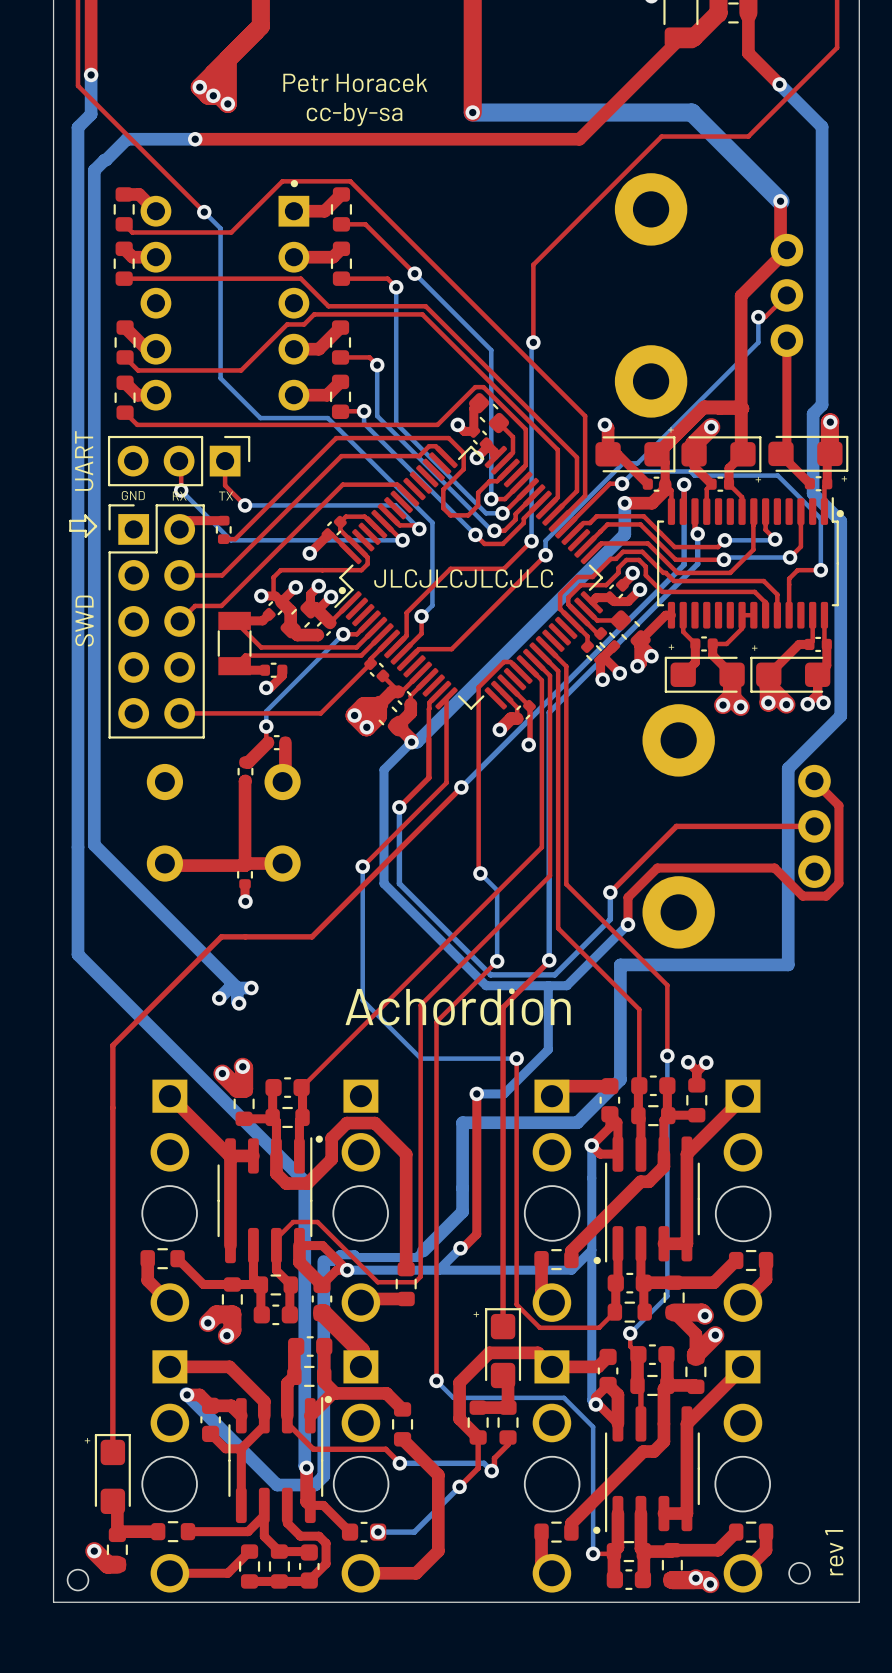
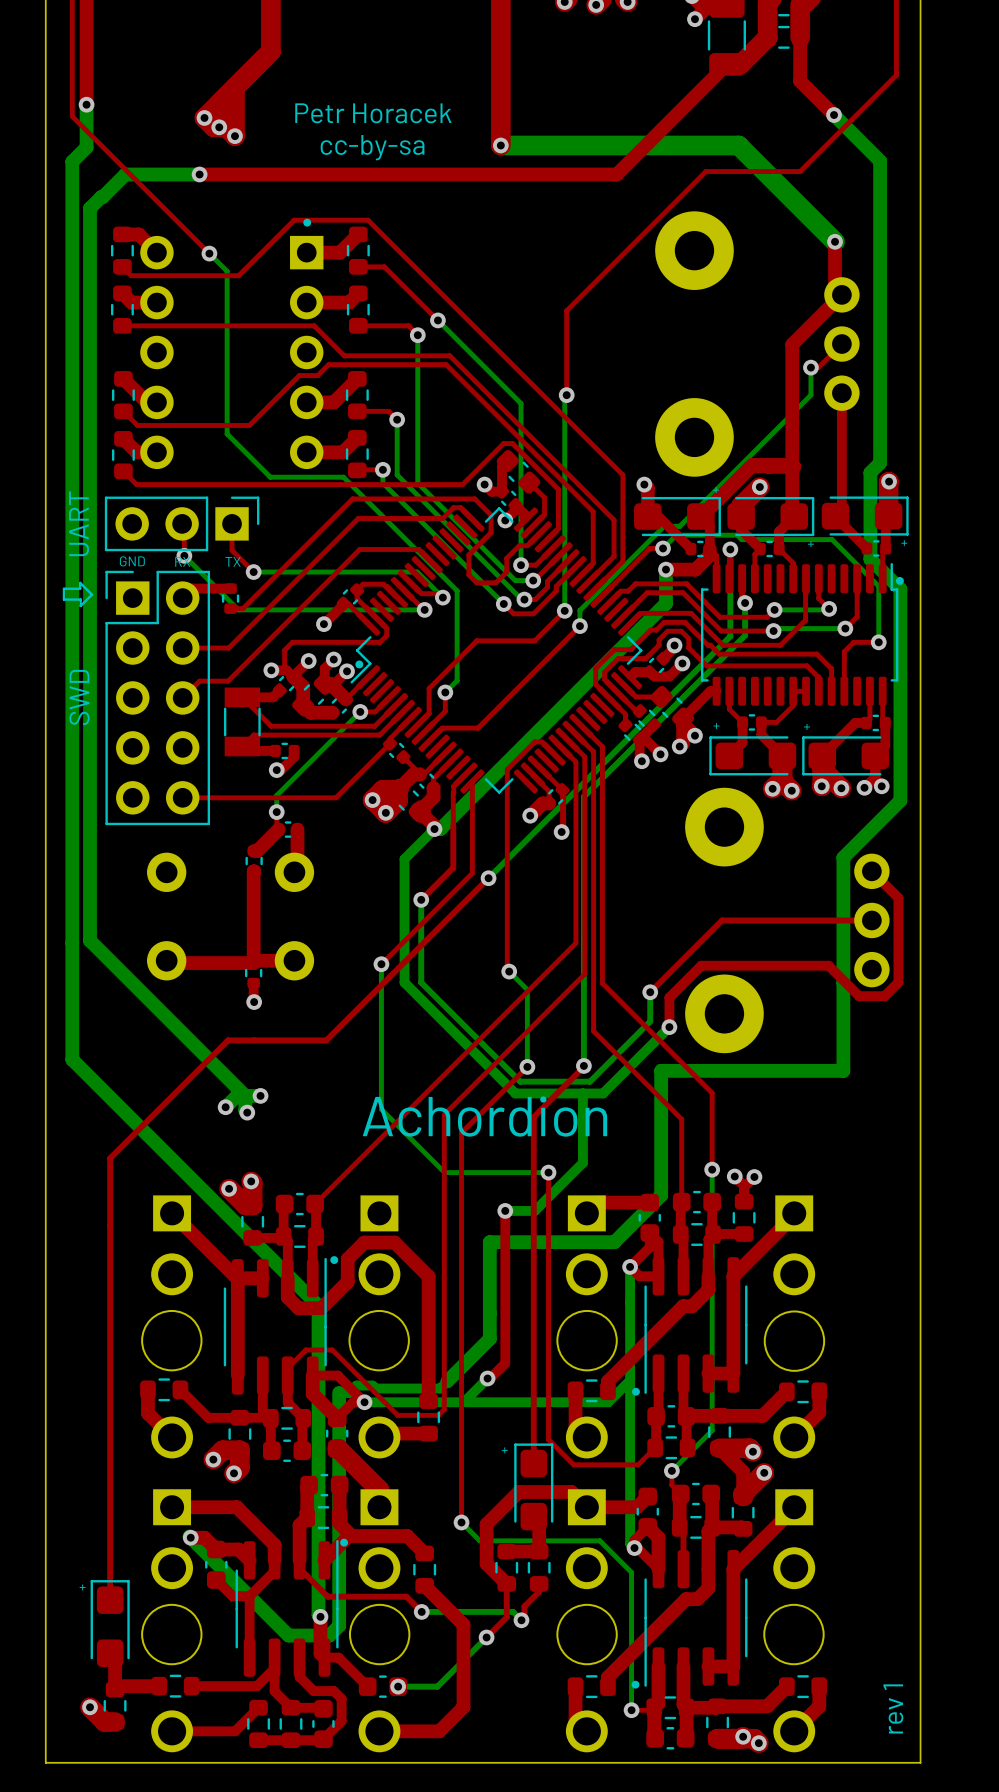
text: JLCJLCJLCJLC (463, 578) -> none
round board edge: [788, 1562, 811, 1585] -> none
round board edge: [66, 1568, 90, 1592] -> none

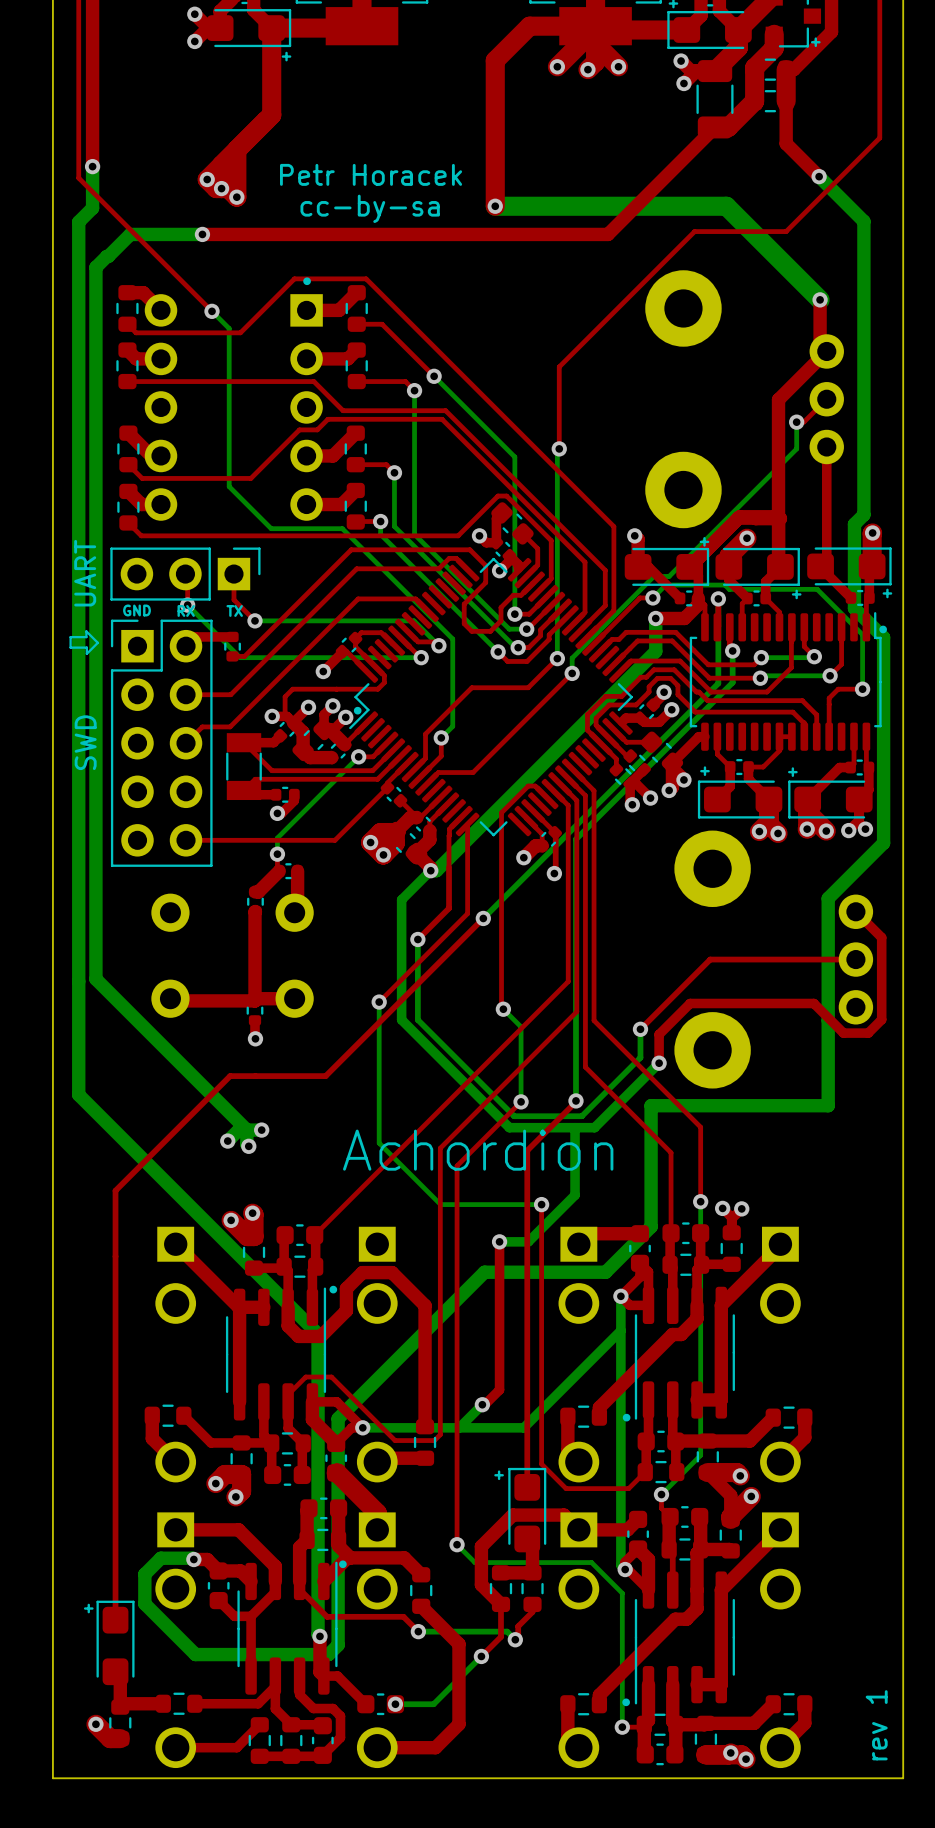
bottom track: (489, 1242) (489, 1338) (440, 1388) (375, 1388) (372, 1385) (356, 1385) (349, 1392) (339, 1392) -> (484, 1272) (338, 1418)
round board edge: [141, 1309, 203, 1372] -> none
round board edge: [348, 1309, 410, 1372] -> none
round board edge: [556, 1309, 618, 1372] -> none
round board edge: [763, 1310, 826, 1372] -> none
bottom track: (630, 1380) (608, 1402) (530, 1402) -> (620, 1330) (523, 1427)
bottom track: (190, 1537) (288, 1635) -> (192, 1558) (160, 1558) (144, 1574) (144, 1603) (195, 1654) (288, 1654)
round board edge: [141, 1603, 203, 1666] -> none
round board edge: [348, 1603, 411, 1666] -> none
round board edge: [556, 1603, 618, 1666] -> none
round board edge: [763, 1603, 825, 1666] -> none

